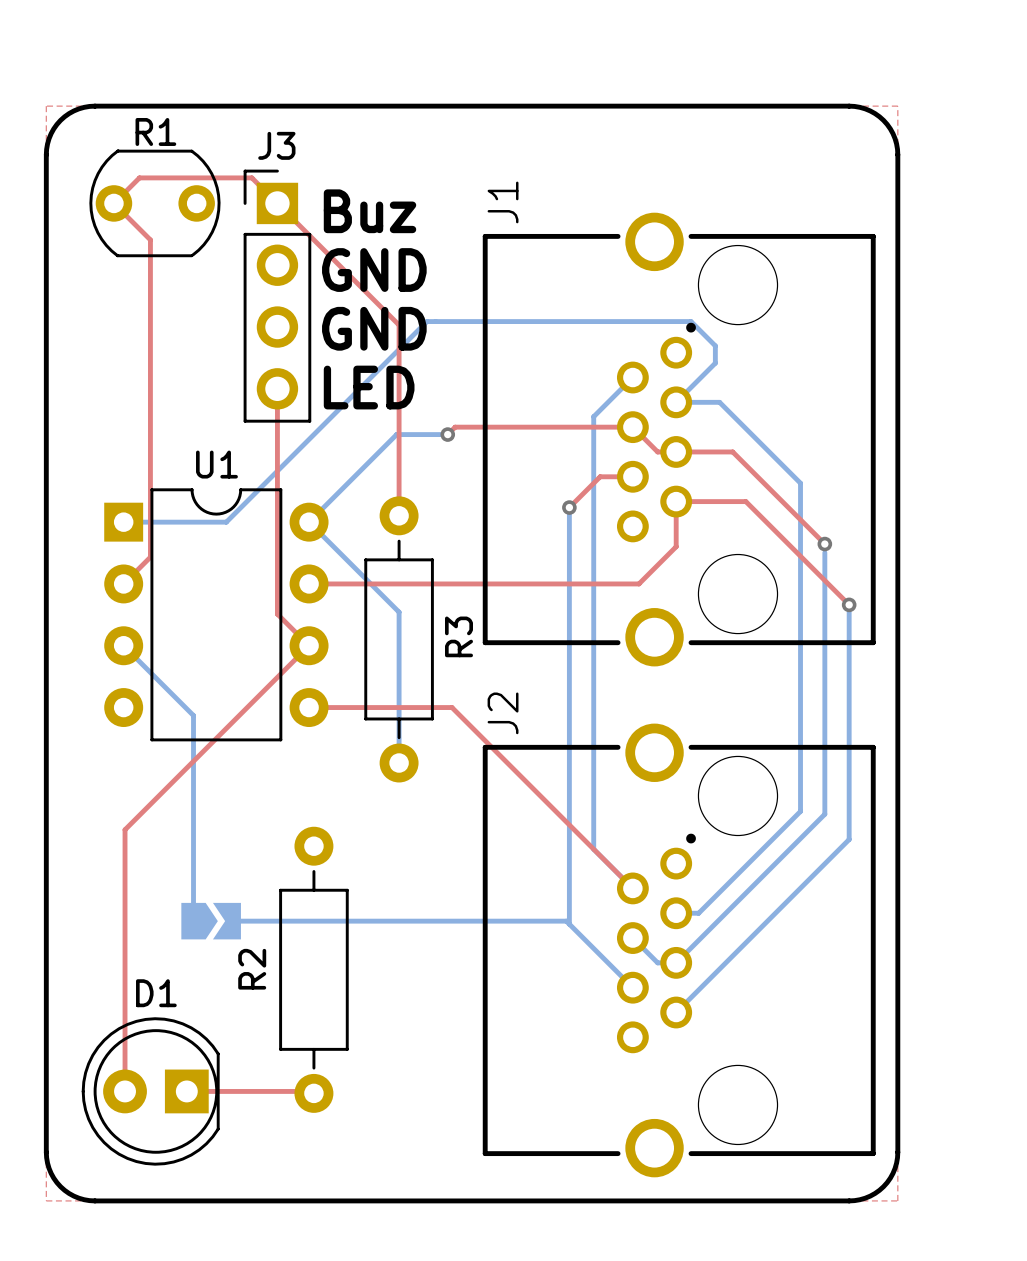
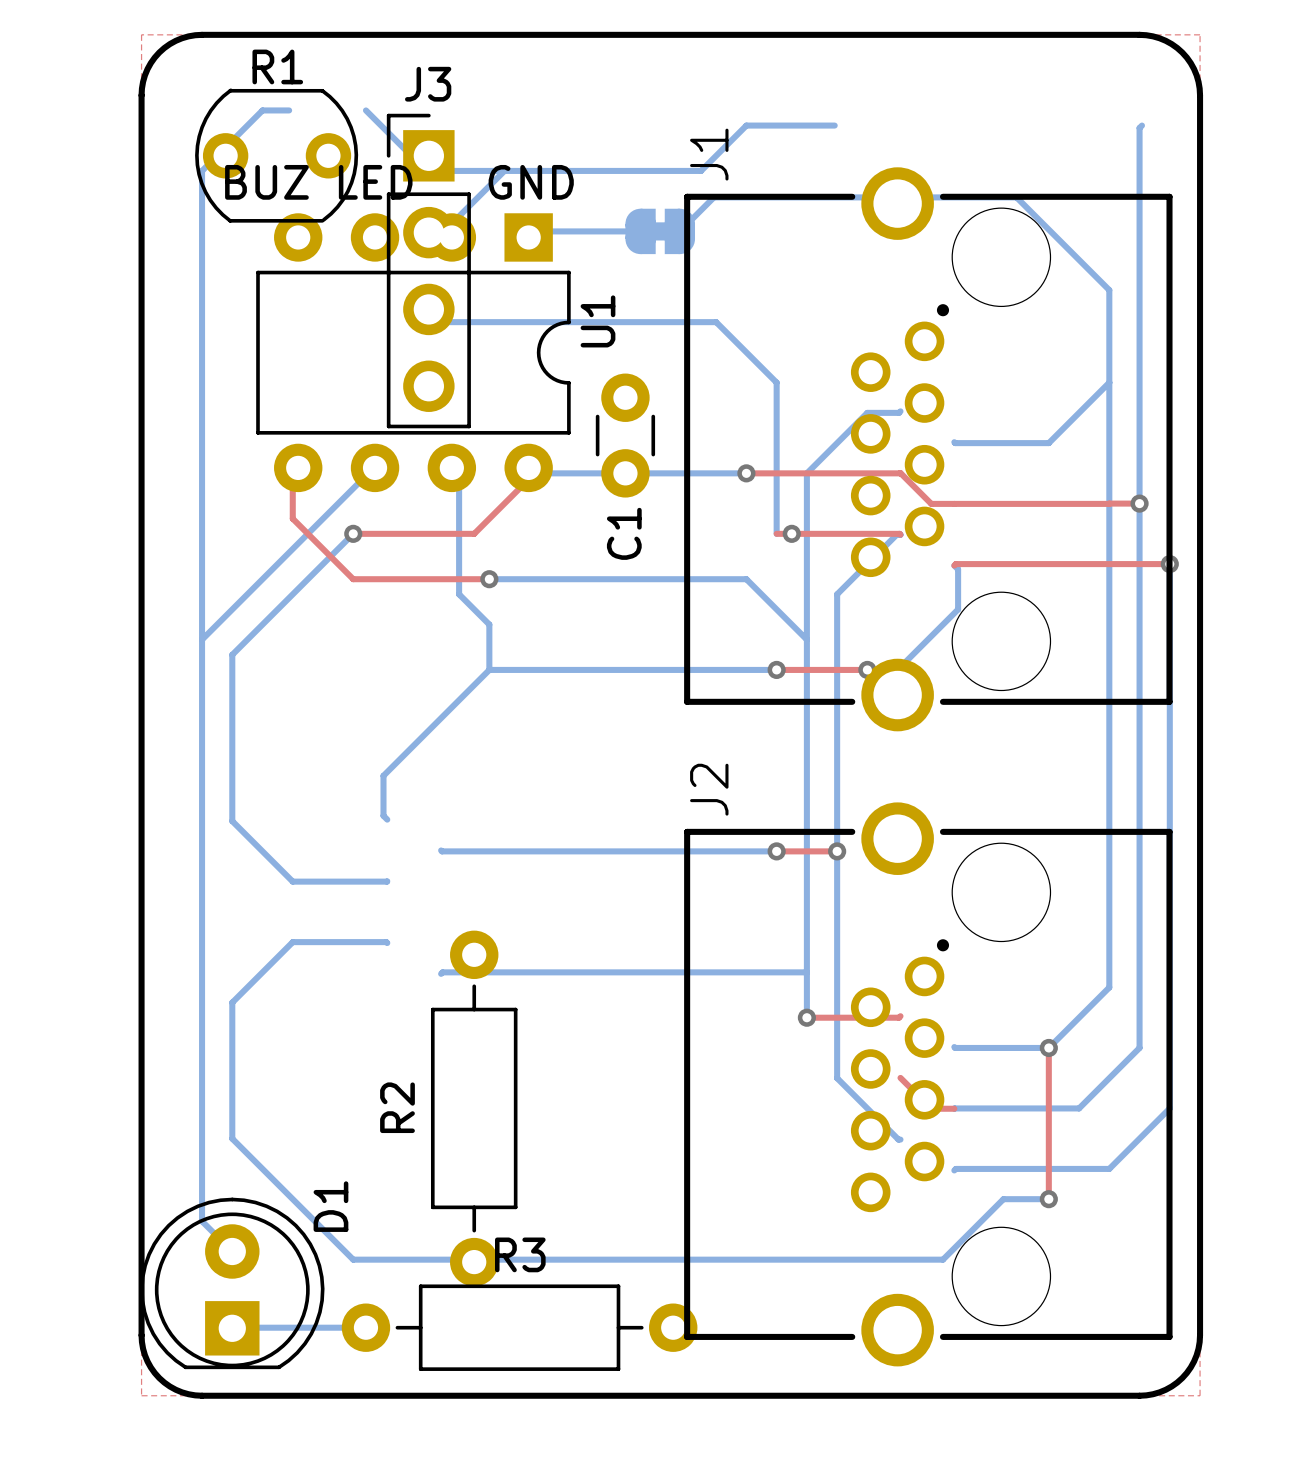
bottom track: none -> (289, 110) (262, 110) (202, 170) (202, 1221) (232, 1251)
bottom track: none -> (365, 110) (426, 170) (701, 170) (746, 125) (834, 125)
bottom track: none -> (1141, 125) (1139, 127) (1139, 654)
text: Buz (370, 211) -> none
bottom track: none -> (504, 170) (451, 223) (451, 237)
text: none -> BUZ LED GND (399, 182)
bottom track: none -> (640, 231) (534, 231) (528, 237)
part: none -> (660, 231)
bottom track: none -> (679, 231) (713, 197) (1016, 197) (1109, 290) (1109, 589)
text: GND (374, 270) -> none
text: GND (374, 328) -> none
bottom track: none -> (418, 322) (716, 322) (776, 382) (776, 533)
bottom track: (632, 377) (593, 416) (593, 849) (632, 888) -> none
bottom track: none -> (1109, 382) (1048, 443) (954, 442)
text: LED (369, 387) -> none
top track: (277, 388) (277, 614) (309, 645) (125, 829) (125, 1091) -> none
bottom track: none -> (900, 411) (867, 412) (806, 473) (806, 1017)
C1: none -> (625, 435)
top track: (447, 434) (455, 427) (632, 427) (657, 451) (732, 451) (824, 544) -> none
bottom track: (447, 434) (396, 434) (309, 522) (399, 612) (399, 763) -> none
via: (447, 434) -> none
top track: none -> (298, 467) (292, 473) (292, 518) (353, 579) (489, 579)
bottom track: none -> (375, 467) (202, 639)
bottom track: none -> (451, 467) (459, 475) (459, 594) (489, 624) (489, 669)
top track: none -> (528, 467) (528, 479) (474, 533) (353, 533)
bottom track: none -> (534, 473) (746, 473)
top track: none -> (746, 473) (900, 473)
via: none -> (746, 473)
top track: none -> (900, 473) (931, 503) (1109, 503)
top track: (632, 476) (600, 476) (569, 507) -> none
top track: none -> (1109, 503) (1139, 503)
via: none -> (1139, 503)
bottom track: none -> (353, 533) (232, 654) (232, 821) (292, 881) (386, 881)
via: none -> (353, 533)
top track: none -> (776, 533) (900, 534)
bottom track: (569, 507) (569, 924) -> none
bottom track: none -> (899, 533) (837, 594) (837, 1078) (900, 1139)
top track: (399, 515) (399, 325) (251, 177) (139, 177) (113, 203) (150, 239) (150, 557) (123, 583) -> none
bottom track: (123, 522) (226, 522) (426, 321) (691, 321) (715, 345) (715, 363) (676, 402) (719, 402) (800, 483) (800, 811) (698, 913) (676, 913) -> none
top track: none -> (1169, 564) (955, 564) (954, 565)
bottom track: none -> (1169, 564) (1169, 1108) (1109, 1168) (954, 1170)
via: none -> (1169, 564)
bottom track: none -> (954, 565) (958, 569) (958, 609) (897, 669) (867, 669)
bottom track: none -> (489, 579) (746, 579) (806, 639)
via: none -> (489, 579)
via: (824, 544) -> none
top track: (309, 583) (638, 583) (676, 546) (676, 501) (745, 501) (849, 604) -> none
via: (849, 604) -> none
U1 rotation: 0° (216, 614) -> 90° clockwise (413, 352)
U1 position: (216, 614) -> (413, 352)
bottom track: none -> (489, 669) (776, 669)
bottom track: none -> (489, 669) (383, 775) (383, 815) (387, 819)
top track: none -> (776, 669) (867, 669)
via: none -> (776, 669)
via: none -> (867, 669)
R3 name position: R3 (459, 636) -> R3 (520, 1254)
R3 rotation: 0° (399, 639) -> 90° clockwise (519, 1327)
R3 position: (399, 639) -> (519, 1327)
bottom track: (123, 645) (193, 715) (193, 921) -> none
top track: (309, 707) (452, 707) (632, 888) -> none
bottom track: none -> (441, 850) (776, 851)
top track: none -> (776, 851) (837, 851)
via: none -> (776, 851)
via: none -> (837, 851)
bottom track: (824, 814) (676, 962) (657, 962) (632, 938) -> (1109, 915) (1109, 987) (1048, 1047) (954, 1047)
bottom track: none -> (387, 943) (292, 942) (232, 1002) (232, 1138) (353, 1259) (942, 1259) (1003, 1199) (1048, 1199)
bottom track: (849, 839) (676, 1012) -> (1139, 946) (1139, 1047) (1079, 1108) (954, 1108)
bottom track: none -> (806, 972) (442, 972) (441, 973)
top track: none -> (900, 1016) (806, 1017)
via: none -> (806, 1017)
part: (211, 921) -> none
bottom track: (228, 921) (566, 921) (632, 987) -> none
top track: none -> (1048, 1047) (1048, 1199)
via: none -> (1048, 1047)
top track: none -> (900, 1077) (931, 1108) (954, 1108)
D1 name position: D1 (156, 993) -> D1 (330, 1206)
via: none -> (1048, 1199)
D1 rotation: 0° (150, 1091) -> 90° clockwise (232, 1283)
top track: (186, 1091) (311, 1091) (313, 1093) -> none
bottom track: none -> (365, 1327) (232, 1328)

